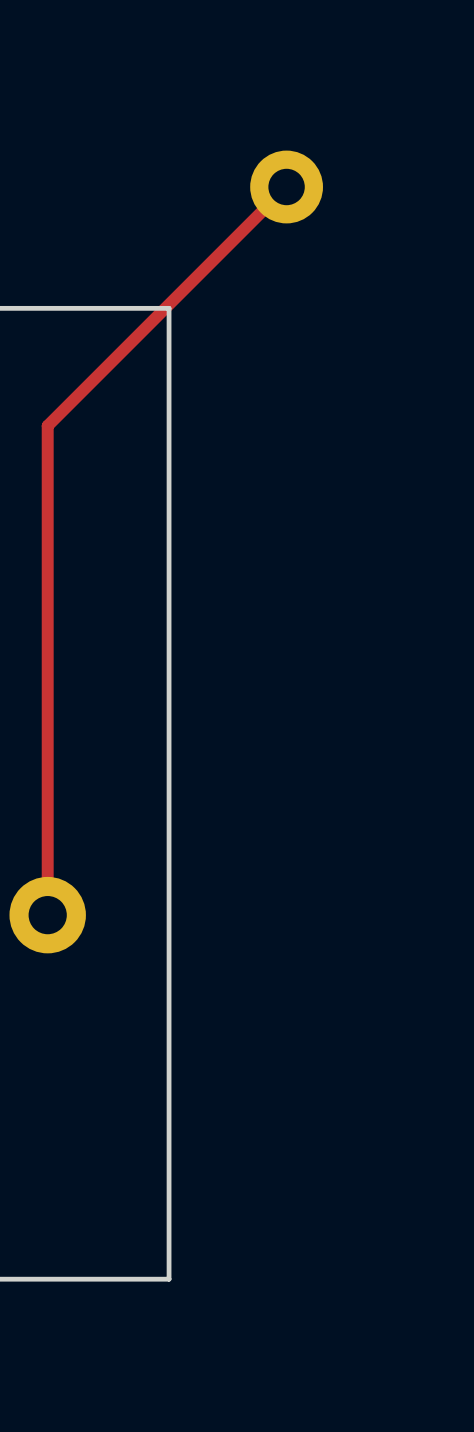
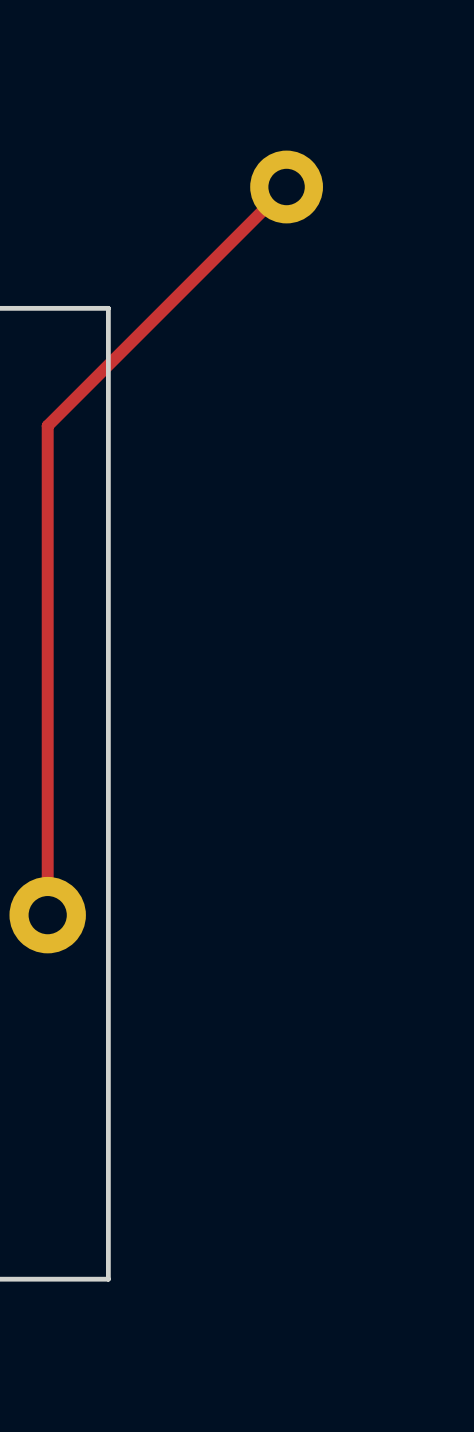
board edge: (108, 308) (169, 308) (169, 1279) (108, 1279) -> (108, 308) (108, 1279)

